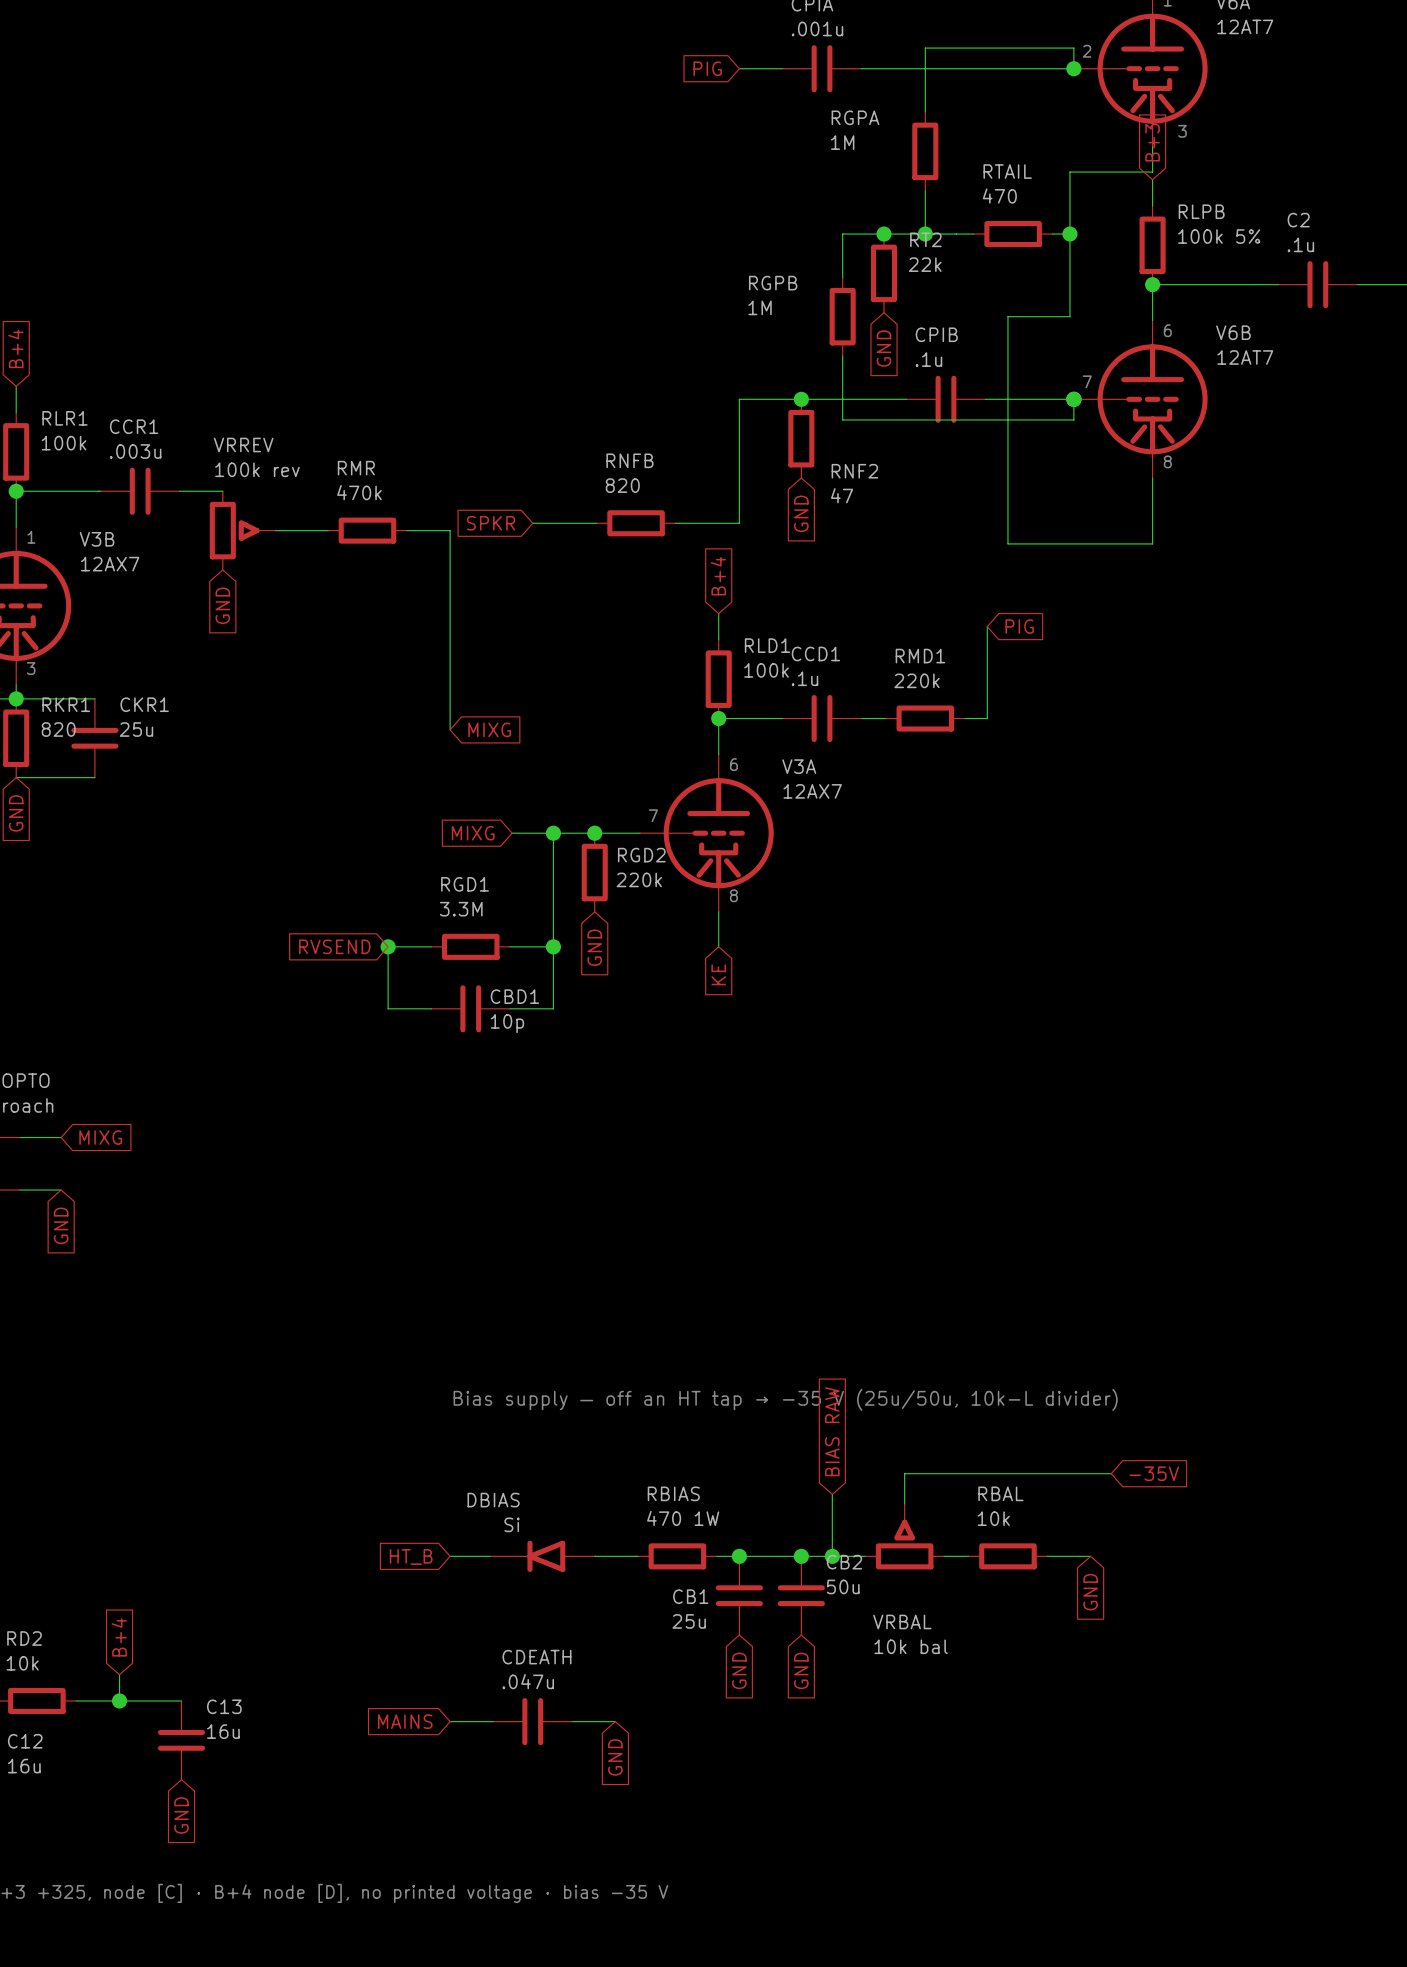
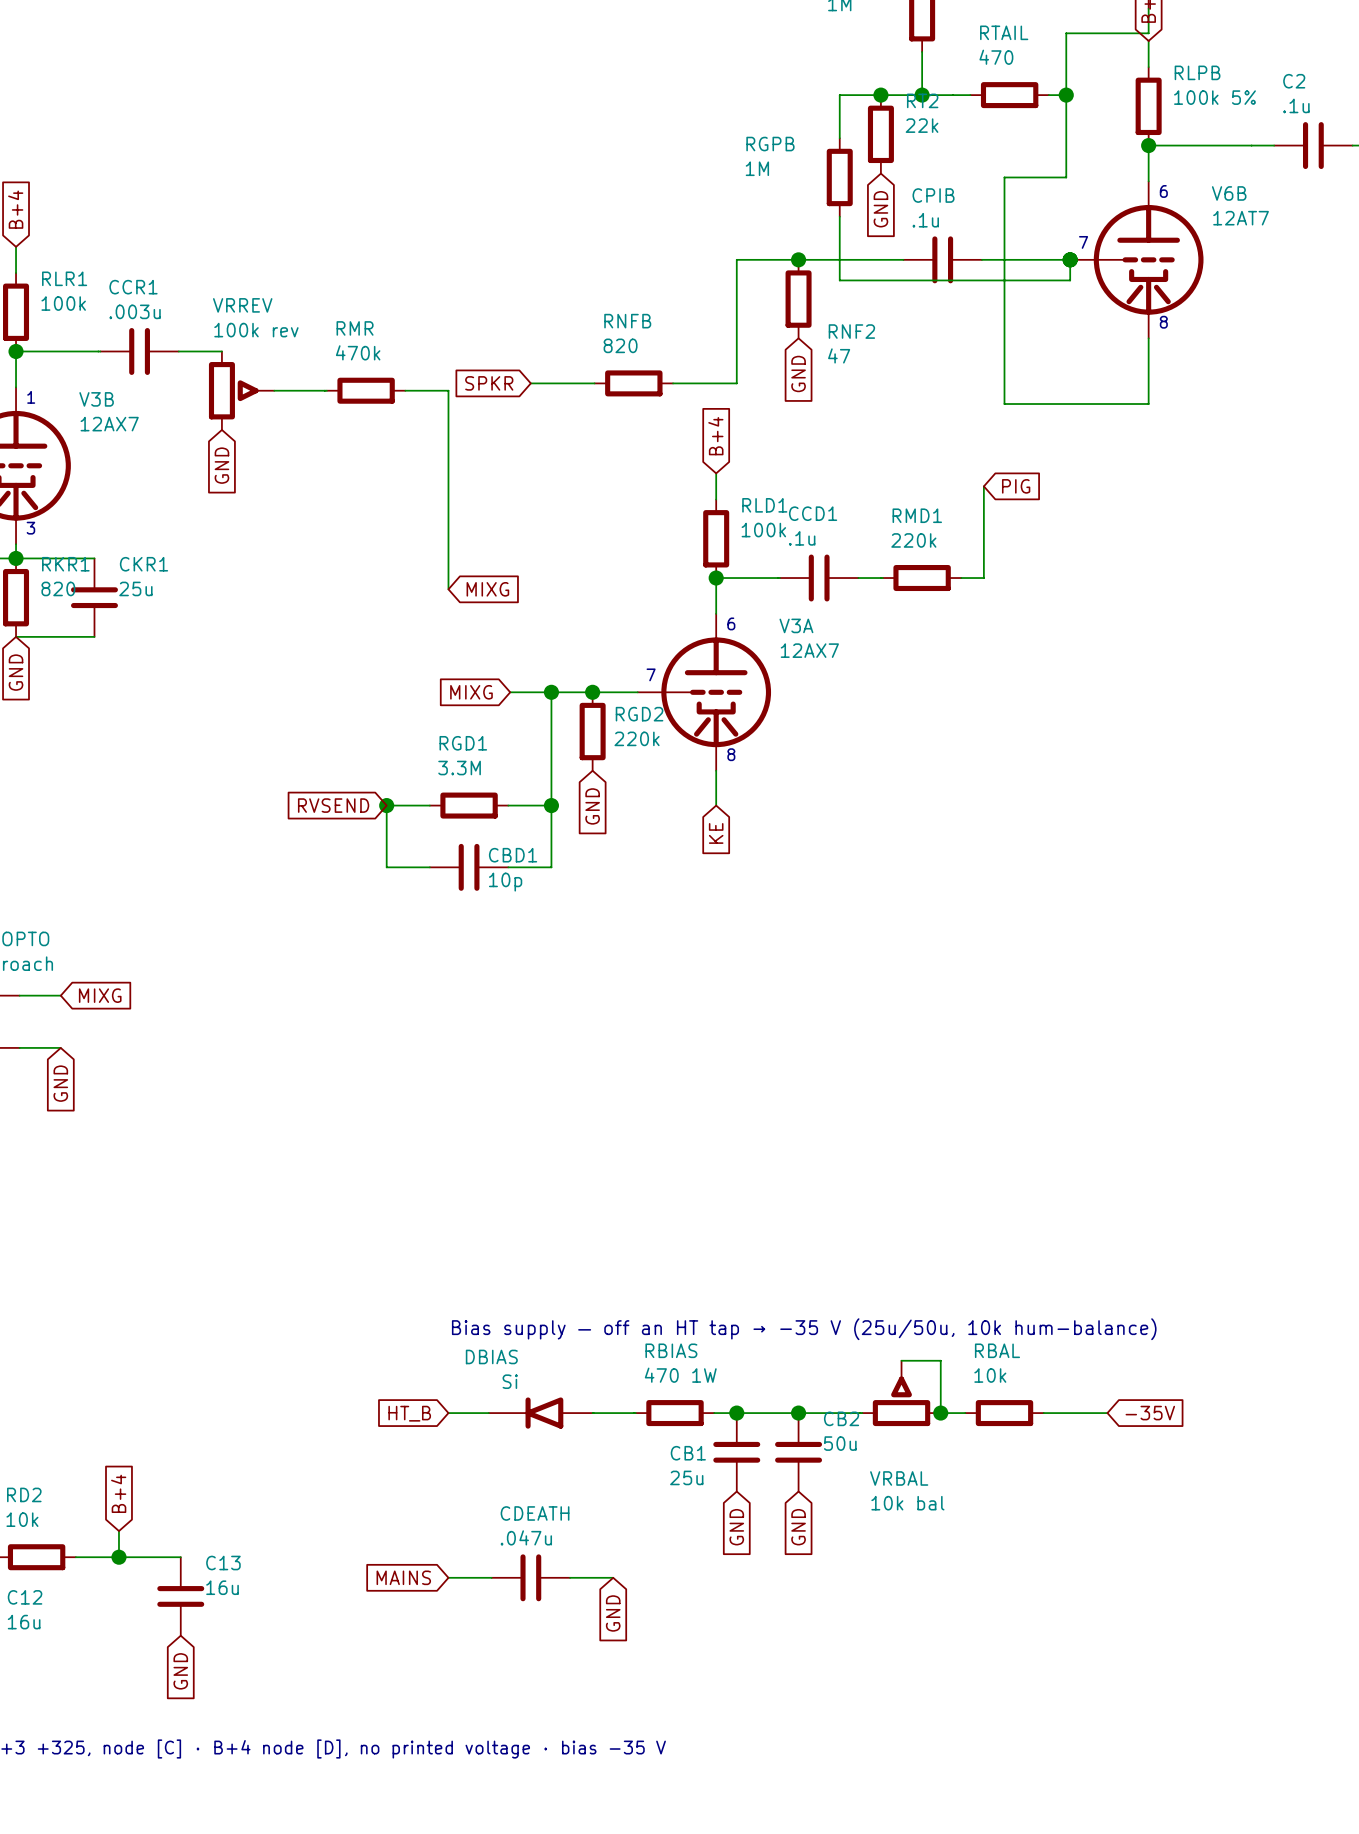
text: Bias supply — off an HT tap → -35 V (25u/50u, 10k-L divider) (785, 1399) -> none
global label: BIAS RAW (832, 1431) -> none
text: none -> Bias supply — off an HT tap → -35 V (25u/50u, 10k hum-balance) (804, 1329)
wire: (1111, 1473) (904, 1473) (904, 1503) -> (940, 1413) (940, 1360) (901, 1360)
global label position: -35V (1154, 1473) -> -35V (1150, 1413)
wire: (832, 1494) (832, 1556) -> none
junction: (832, 1556) -> none
junction: none -> (940, 1413)
wire: none -> (1086, 1413) (1107, 1413)
global label: GND (1090, 1592) -> none

